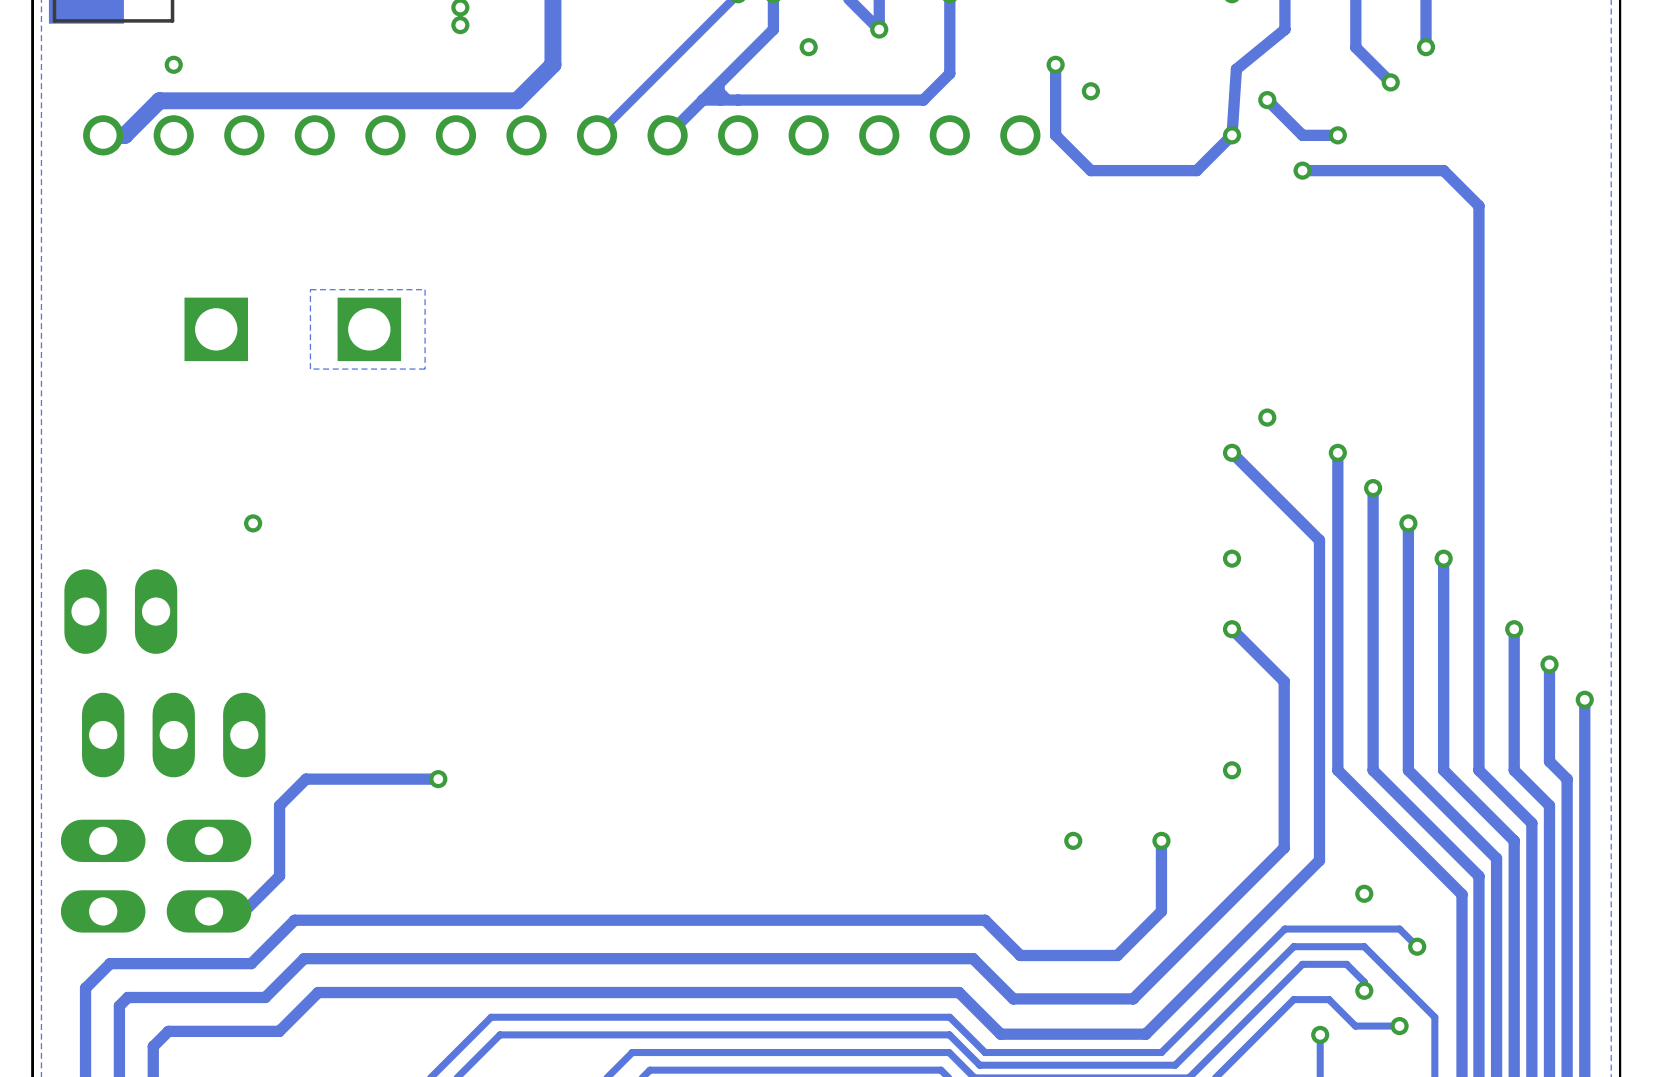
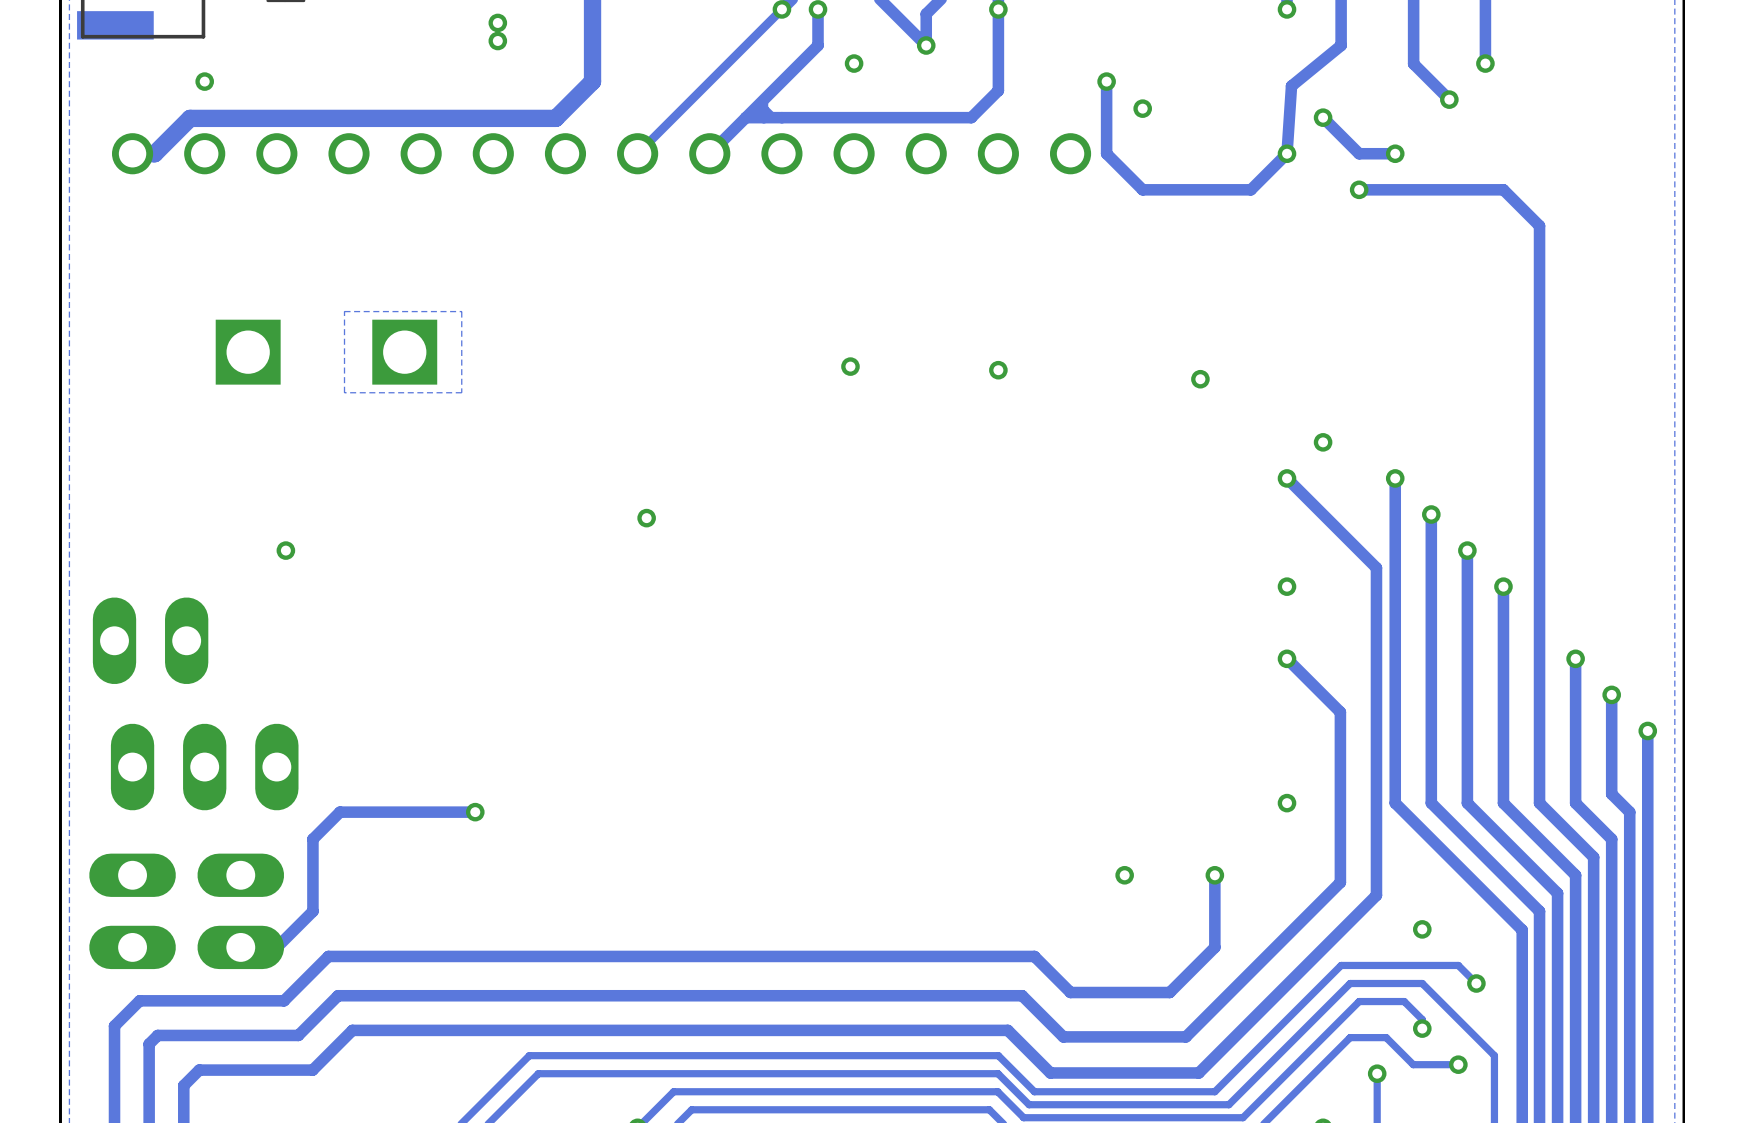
via: none -> (850, 366)
via: none -> (998, 370)
via: none -> (1200, 379)
via: none -> (646, 518)

